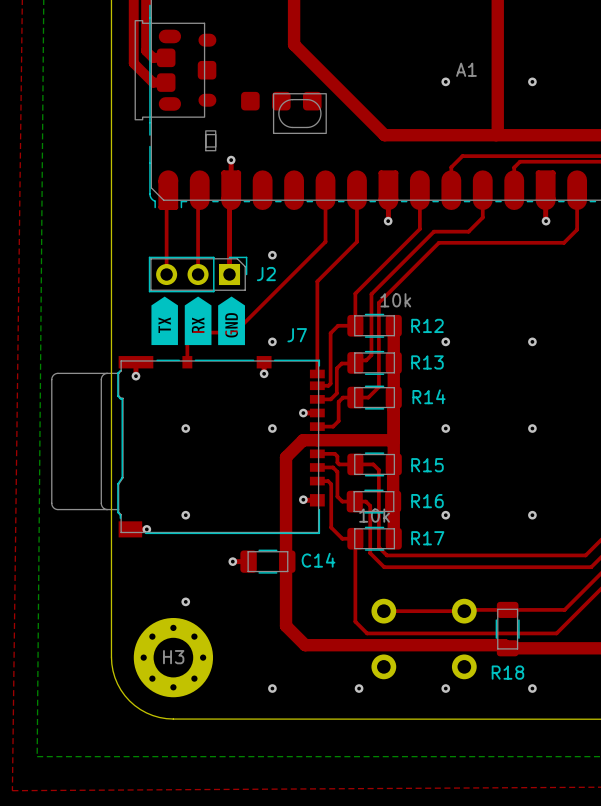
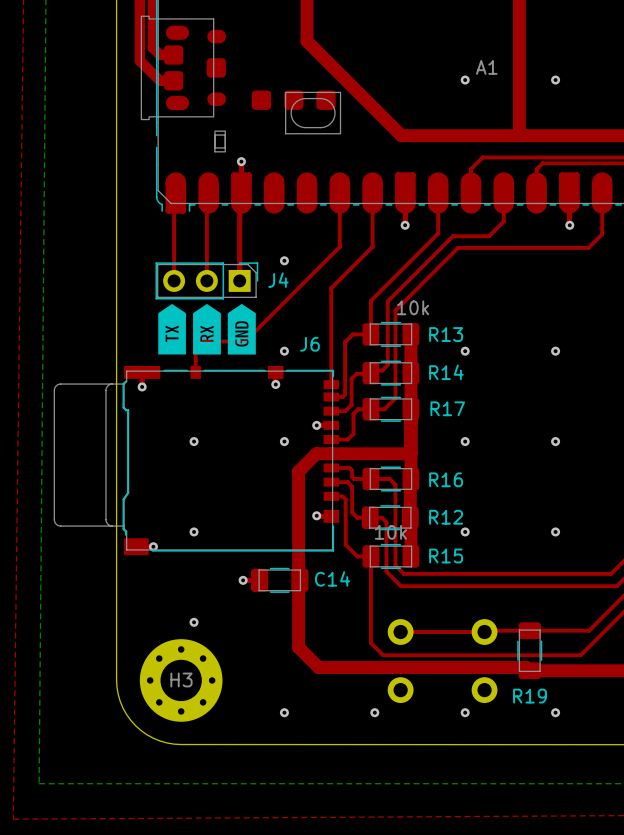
J2 name: J2 (266, 274) -> J4 (278, 280)
R12 name: R12 (427, 325) -> R13 (446, 334)
J7 name: J7 (297, 335) -> J6 (309, 344)
R13 name: R13 (427, 362) -> R14 (446, 372)
R14 name: R14 (429, 396) -> R17 (447, 408)
R15 name: R15 (427, 465) -> R16 (446, 479)
R16 name: R16 (427, 501) -> R12 (446, 517)
R17 name: R17 (427, 538) -> R15 (446, 555)
R18 name: R18 (507, 672) -> R19 (530, 696)

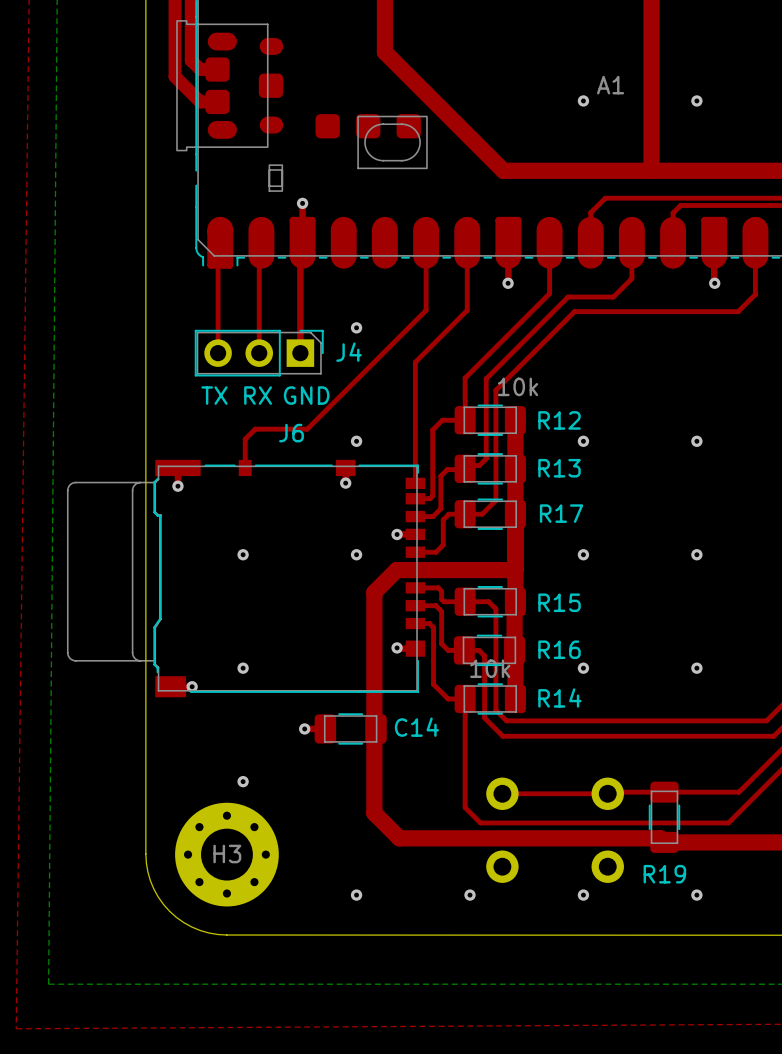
drawing: [158, 303, 256, 355] -> none
text: none -> TX (214, 395)
text: none -> RX (258, 395)
text: none -> GND (306, 395)
R13 name: R13 (446, 334) -> R12 (559, 420)
J6 name position: J6 (309, 344) -> J6 (291, 433)
R14 name: R14 (446, 372) -> R13 (559, 468)
R16 name: R16 (446, 479) -> R15 (559, 602)
R12 name: R12 (446, 517) -> R16 (559, 649)
R15 name: R15 (446, 555) -> R14 (559, 697)

